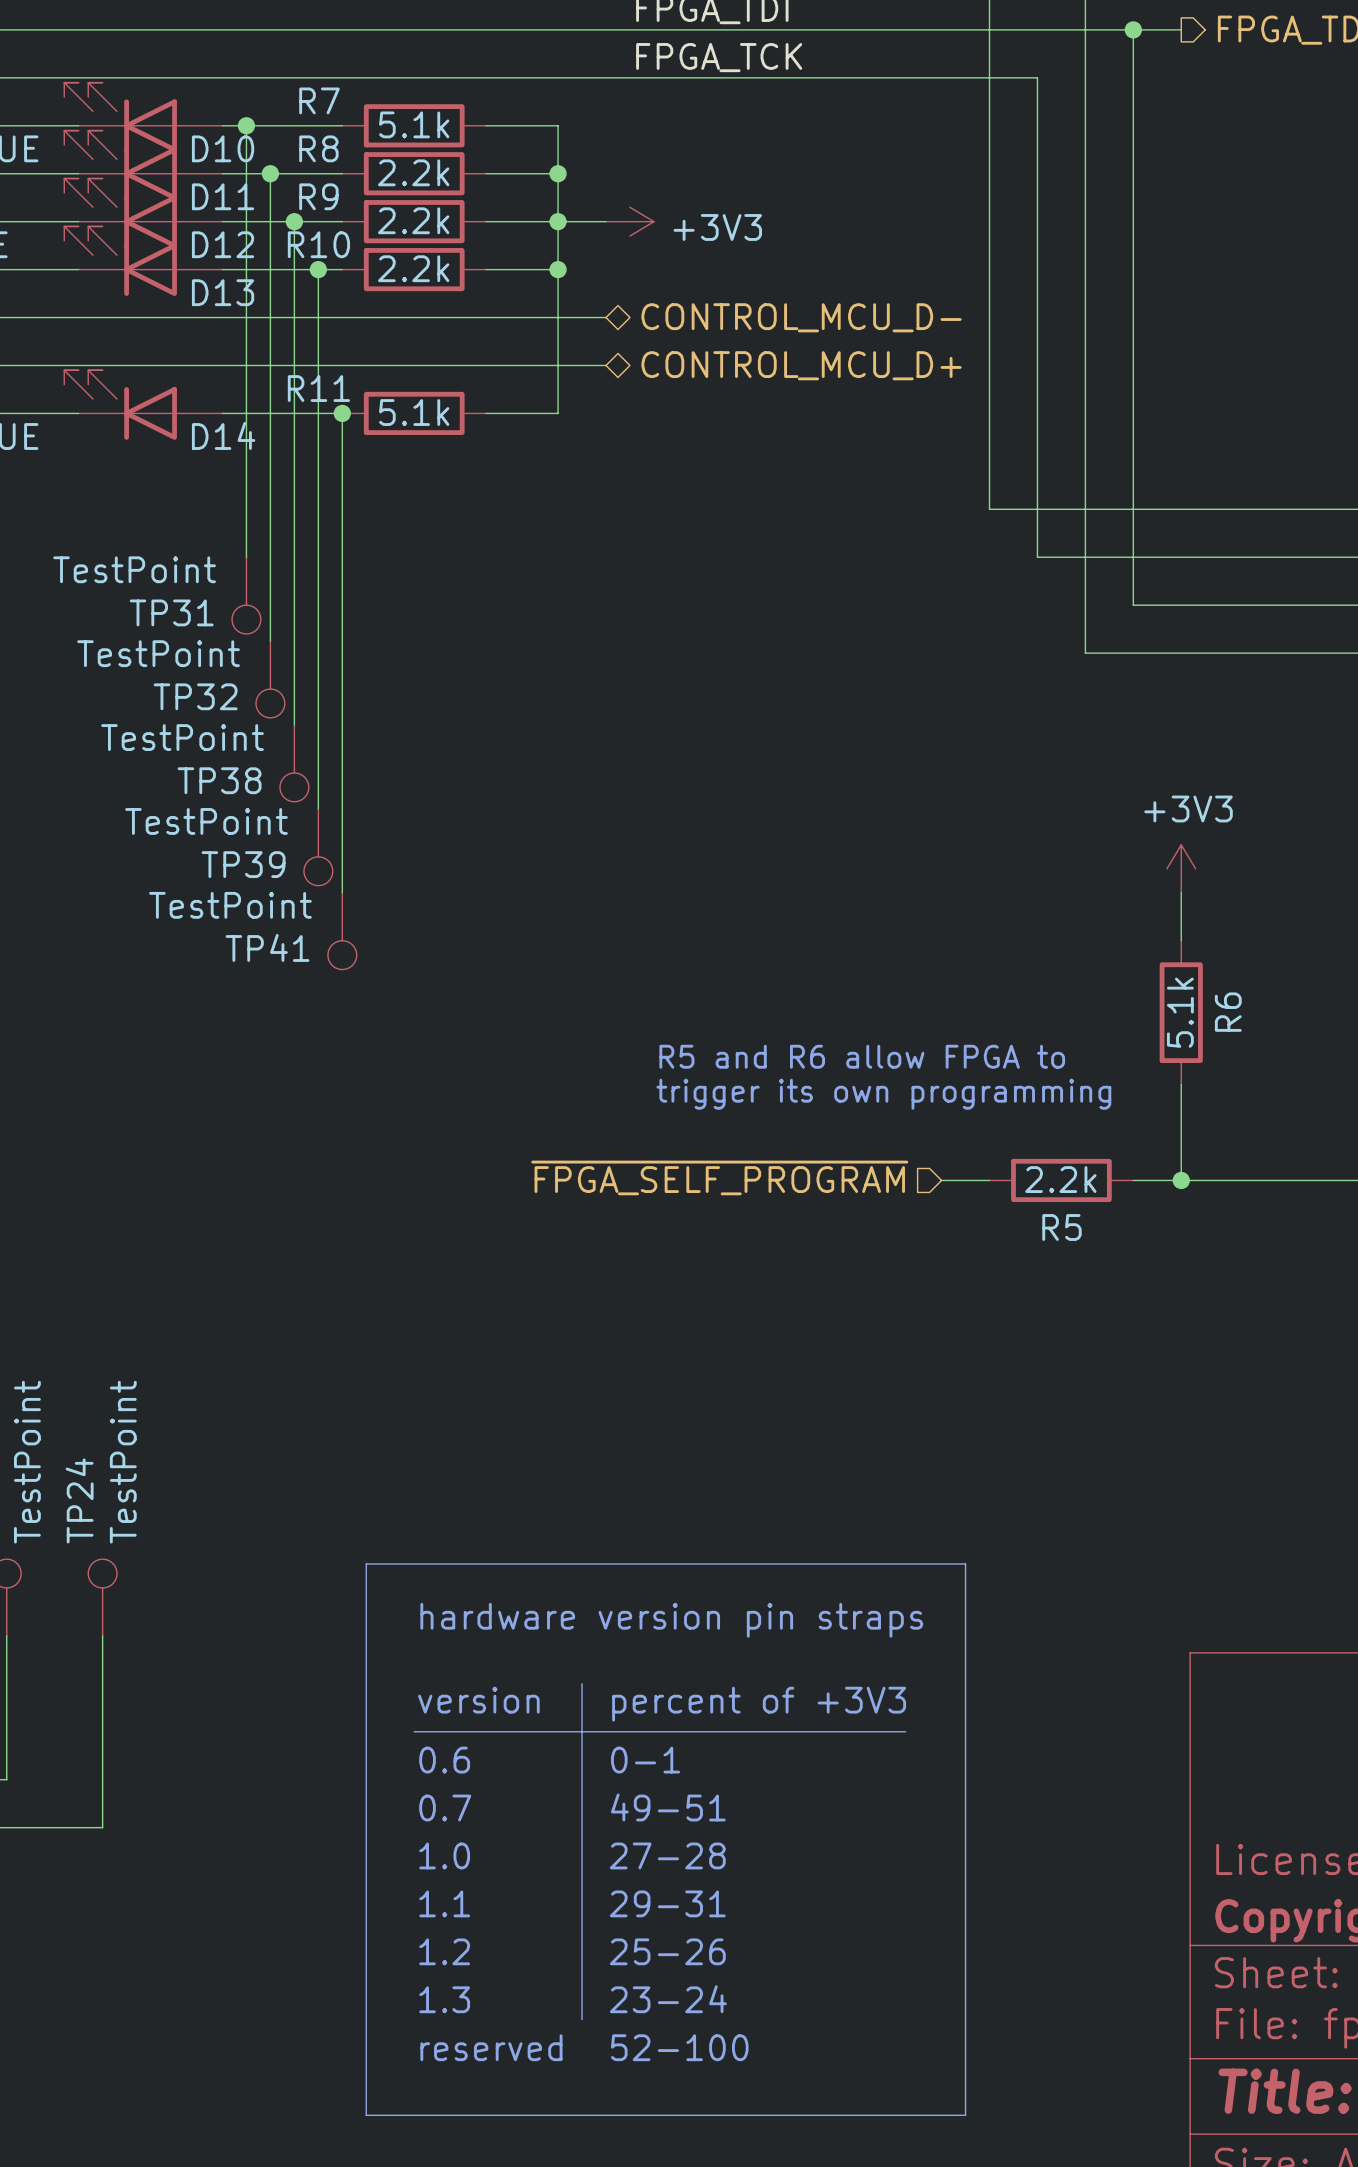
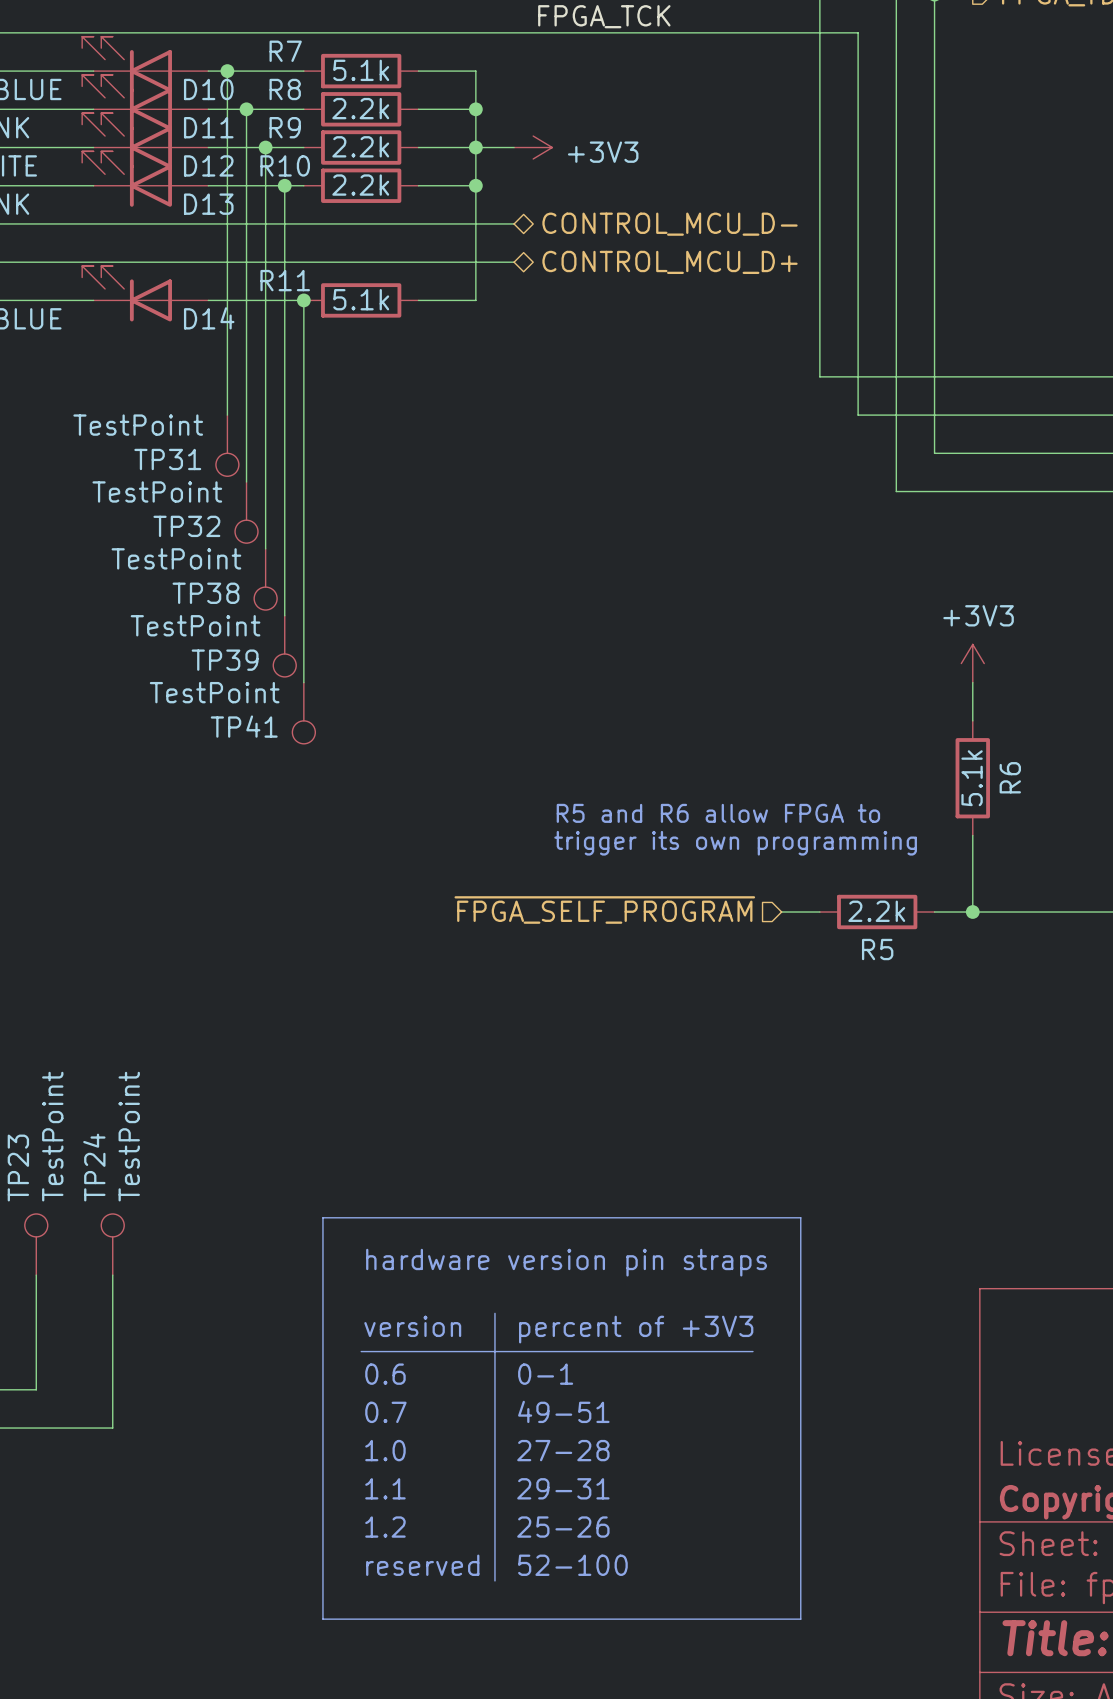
text: 1.3 (444, 1999) -> reserved (422, 1565)
text: 23-24 (668, 1999) -> 52-100 (572, 1565)
text: reserved (491, 2047) -> none
text: 52-100 (679, 2047) -> none
line: (366, 2067) (366, 2115) (965, 2115) (965, 2067) -> (322, 1619) (800, 1619)

